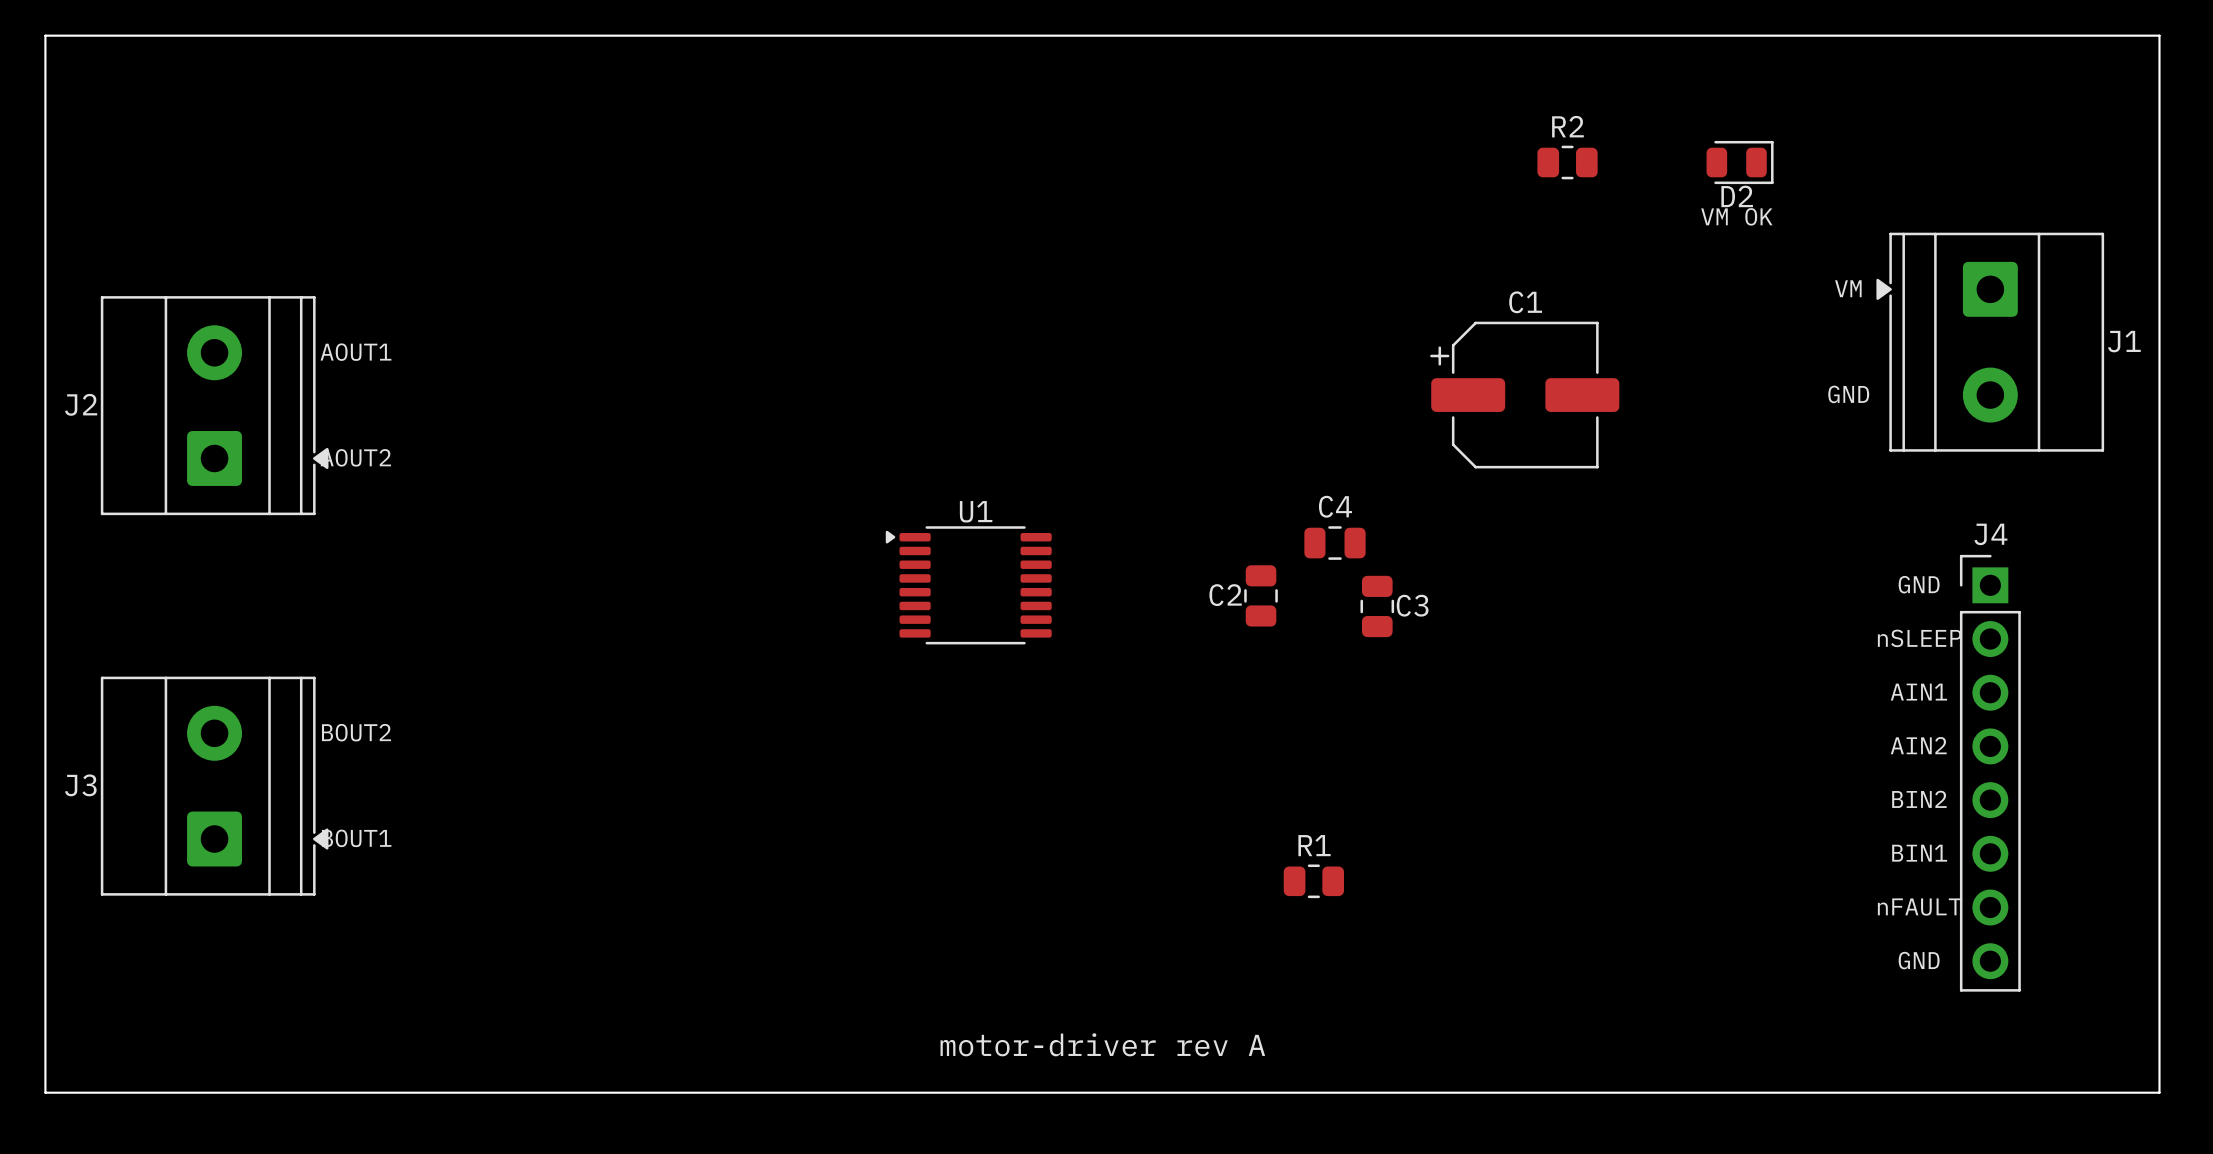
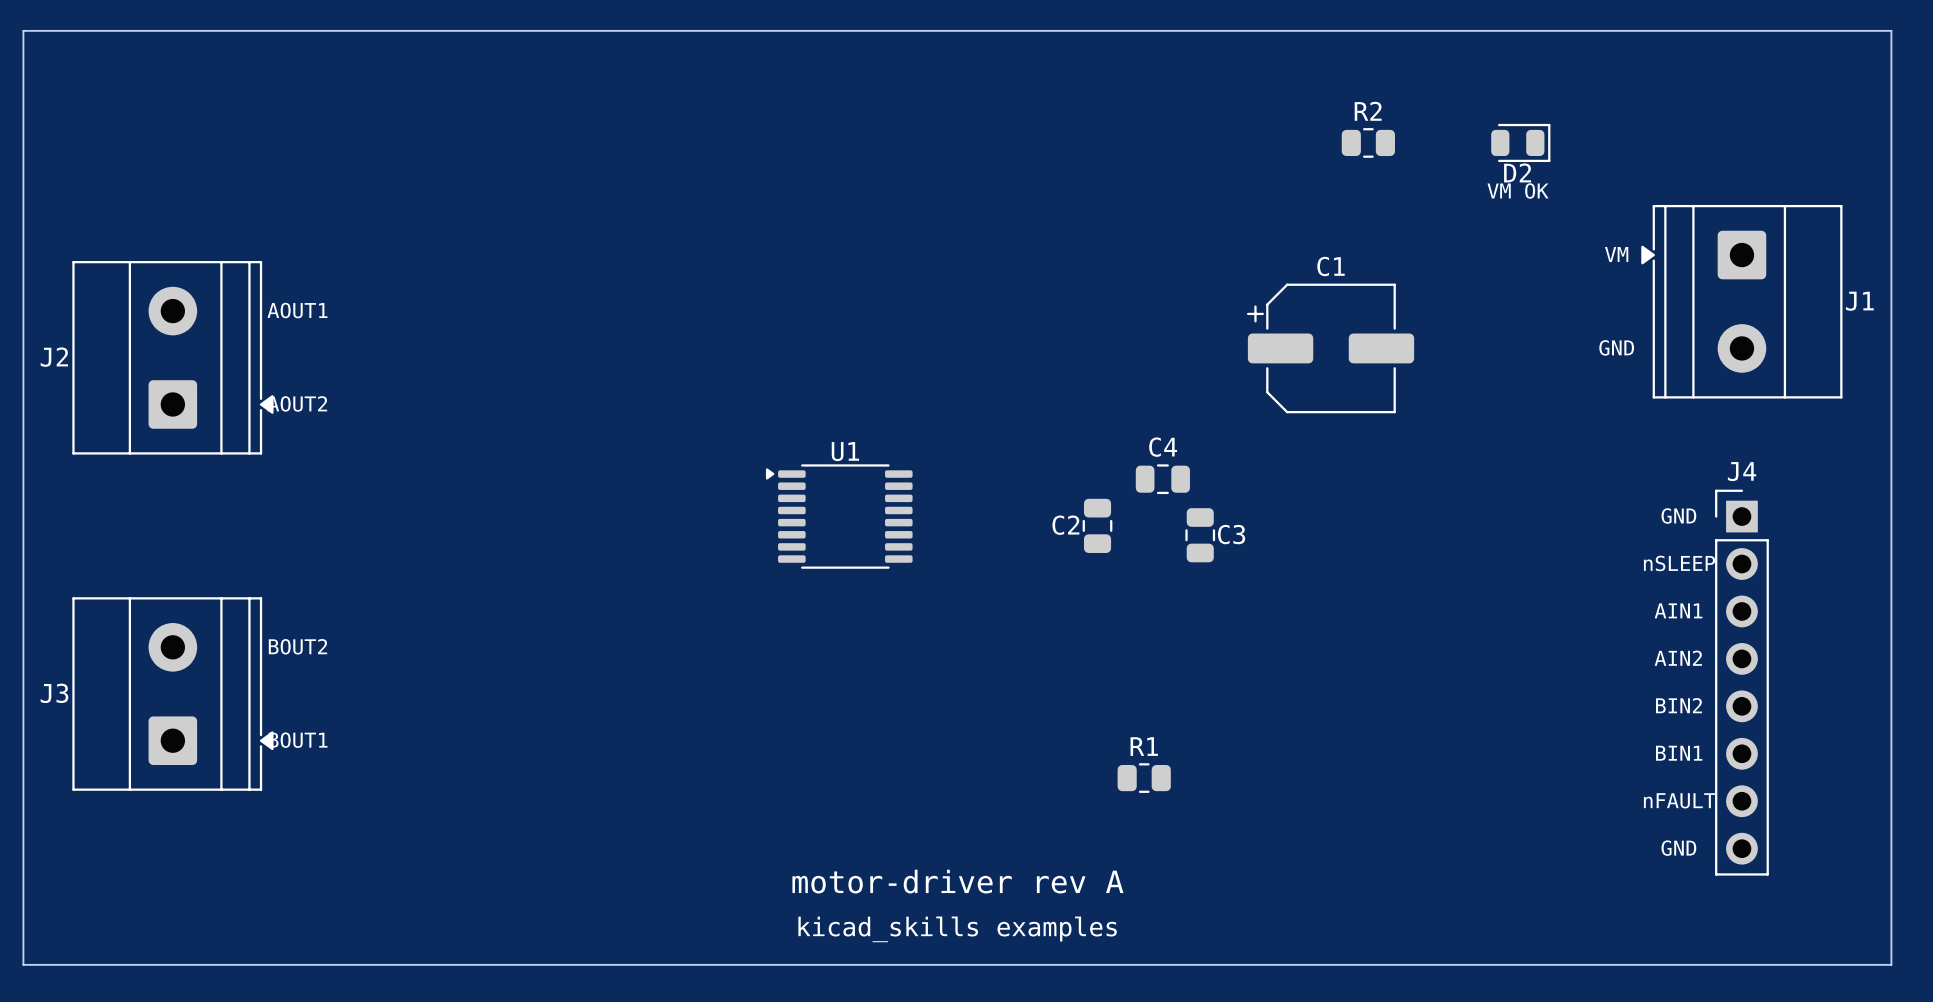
text: none -> motor-driver rev A (957, 881)
text: motor-driver rev A (1102, 1044) -> kicad_skills examples (957, 929)

